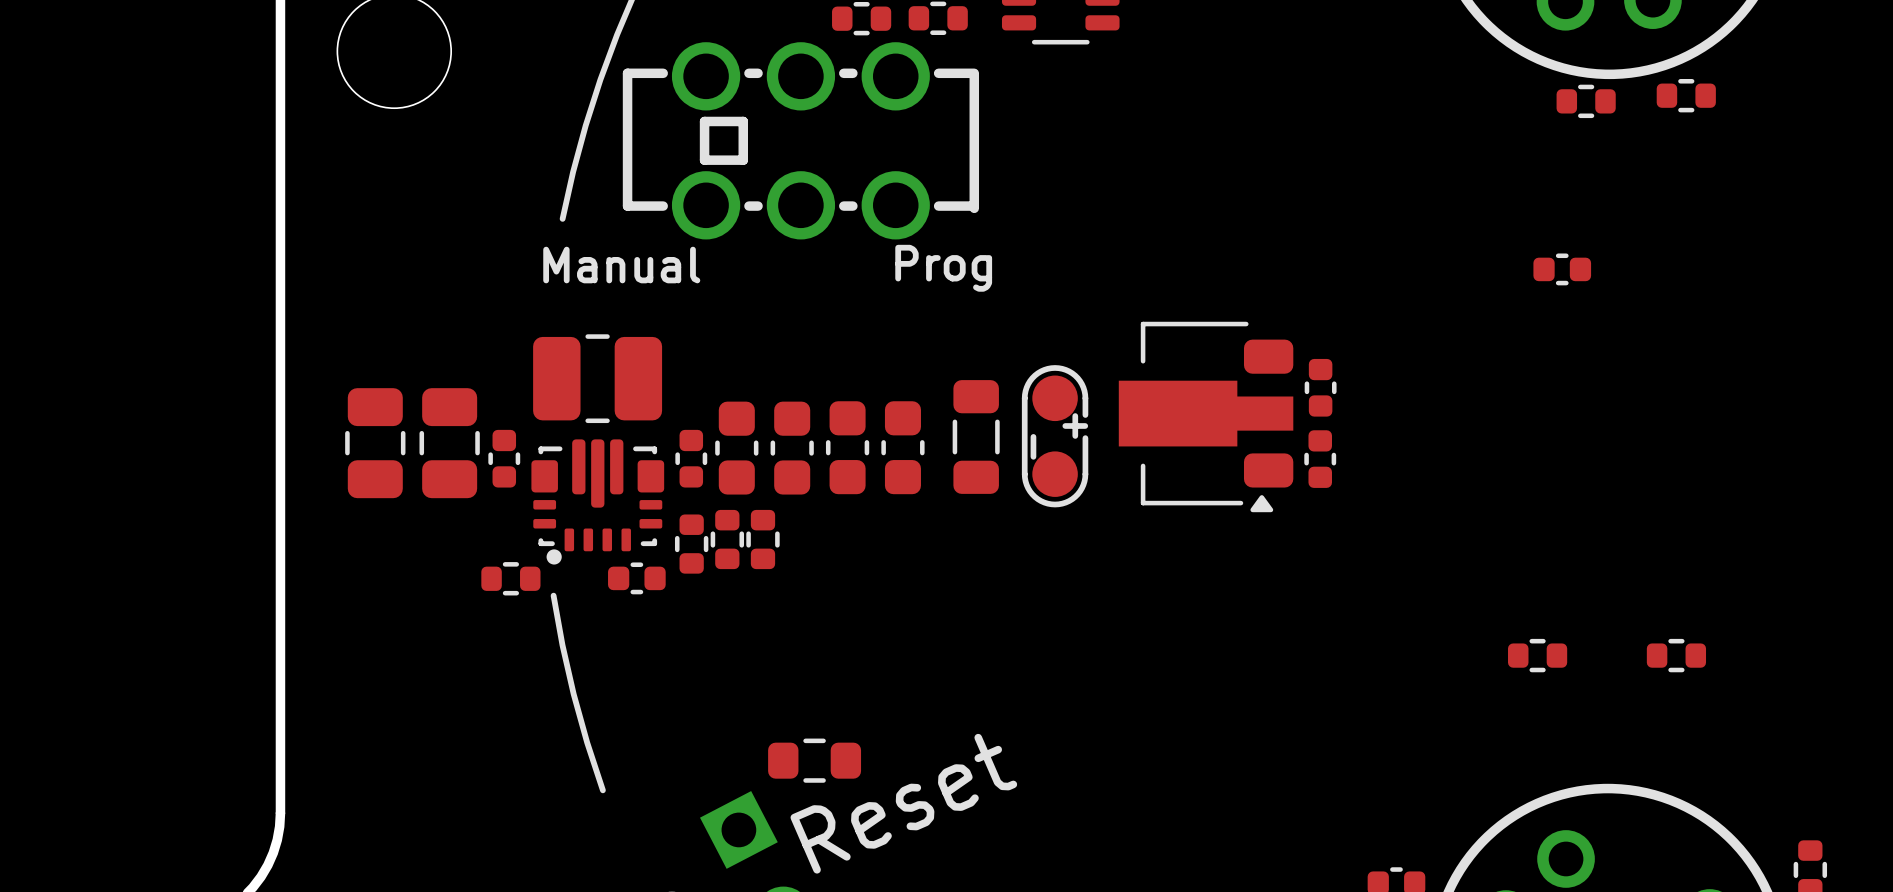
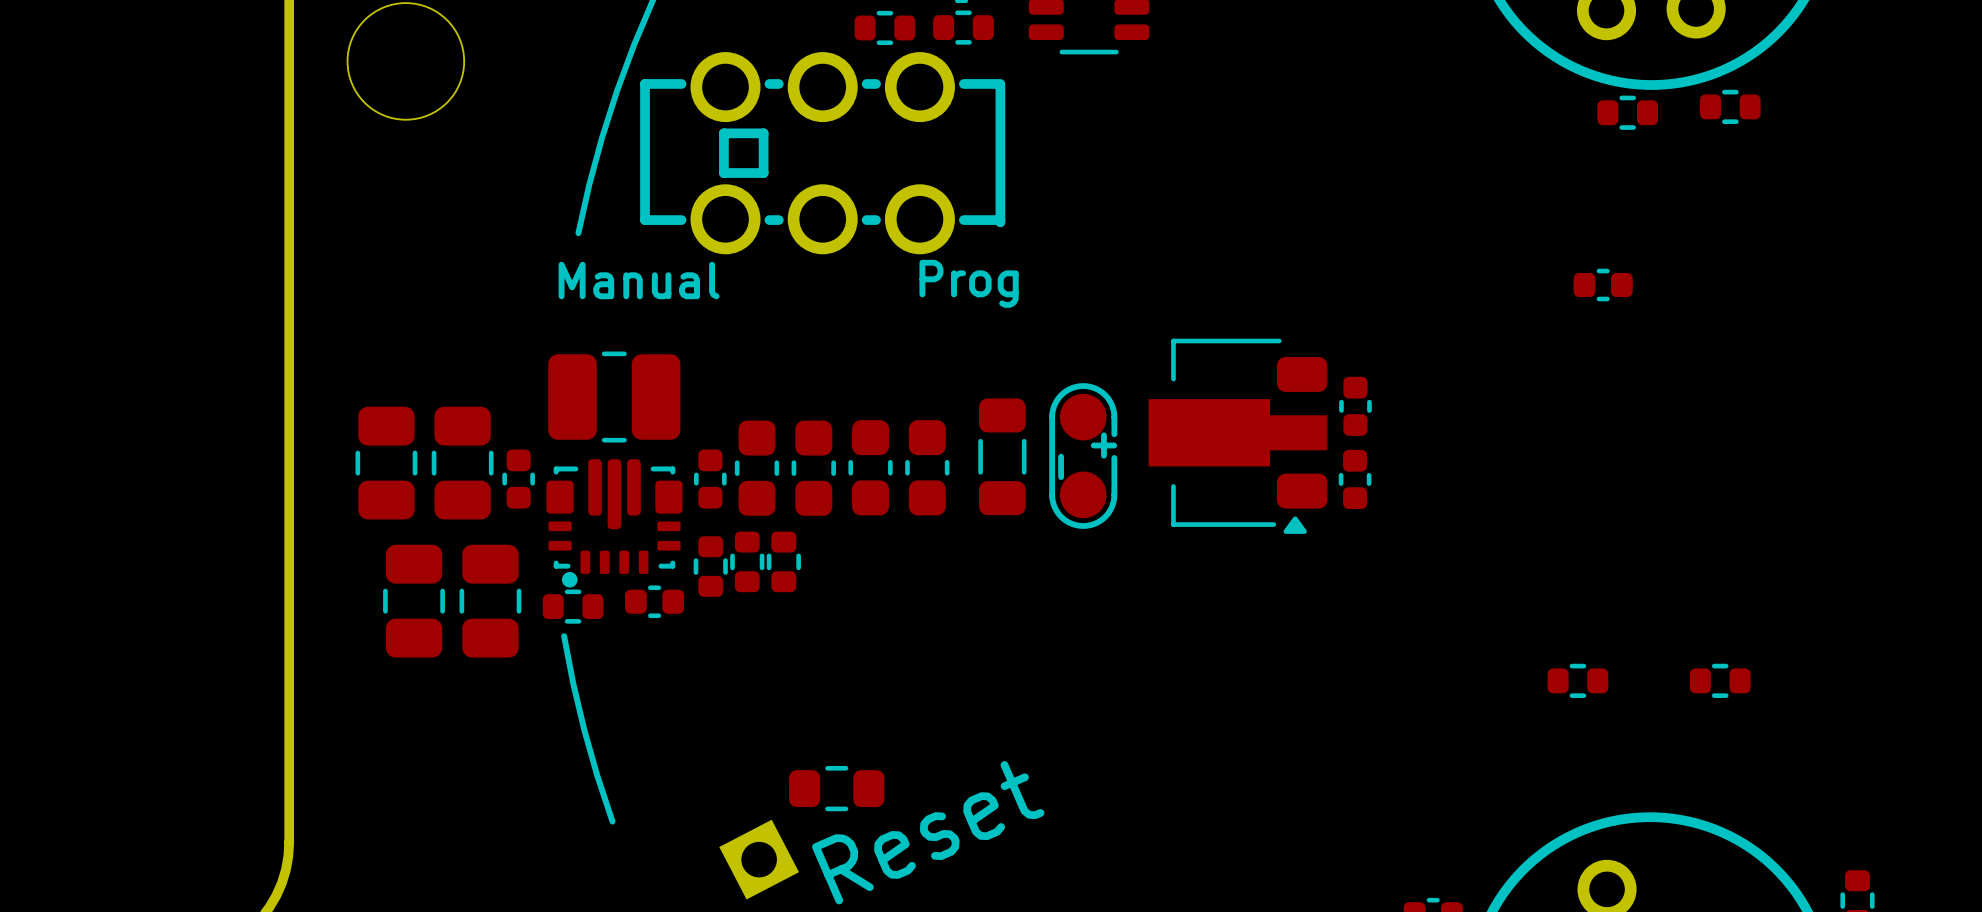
part: none -> (414, 601)
part: none -> (490, 601)
part position: (510, 578) -> (573, 606)
line: (553, 595) (573, 694) (602, 790) -> none
line: none -> (564, 636) (584, 729) (612, 821)

